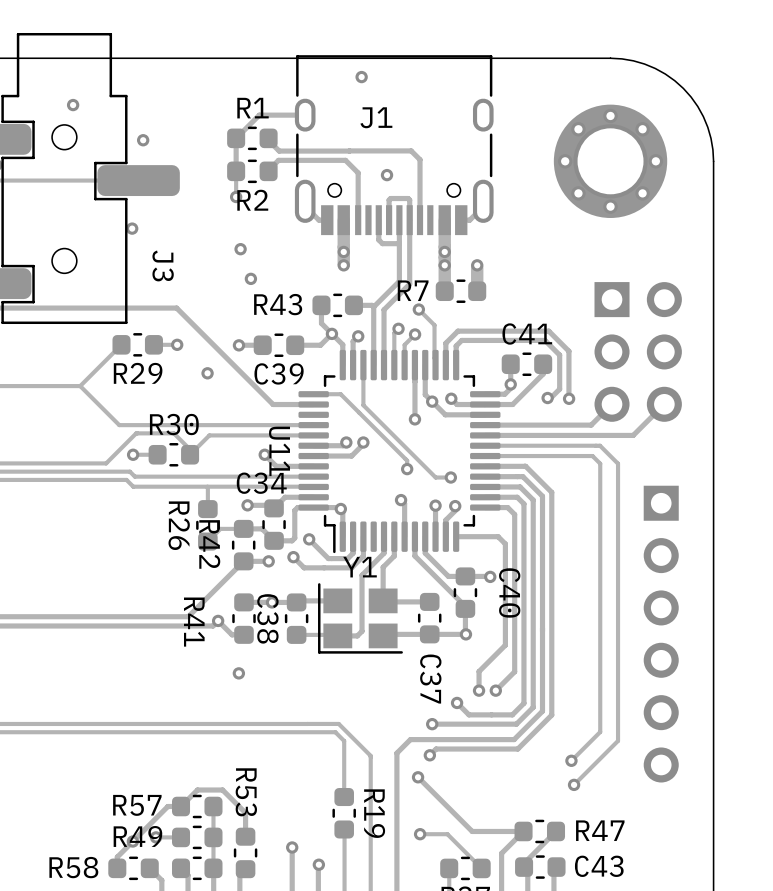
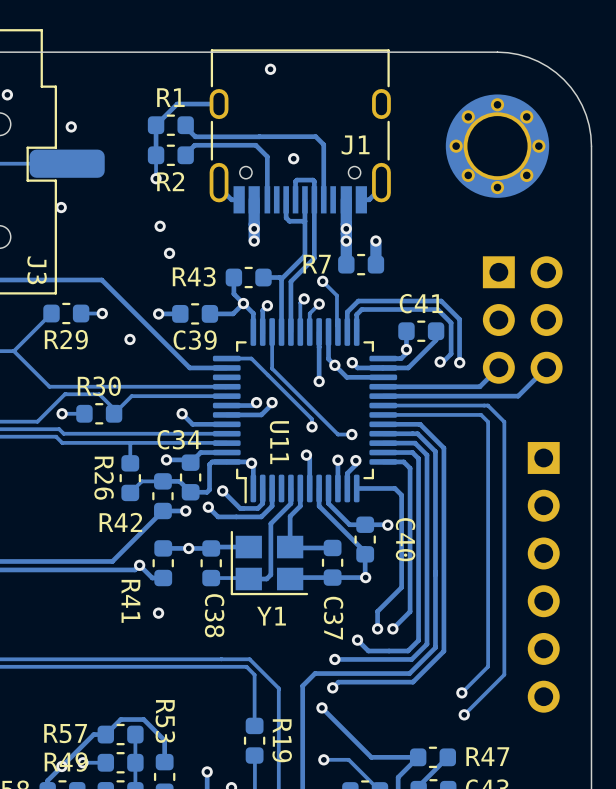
J1 name position: J1 (376, 117) -> J1 (355, 145)
J3 name position: J3 (163, 265) -> J3 (37, 270)
U11 name position: U11 (279, 451) -> U11 (279, 442)
R42 name rotation: 0° (209, 544) -> 90° counterclockwise (120, 522)
Y1 name position: Y1 (360, 567) -> Y1 (271, 616)
C38 name position: C38 (267, 618) -> C38 (214, 615)
R41 name position: R41 (194, 622) -> R41 (130, 601)

